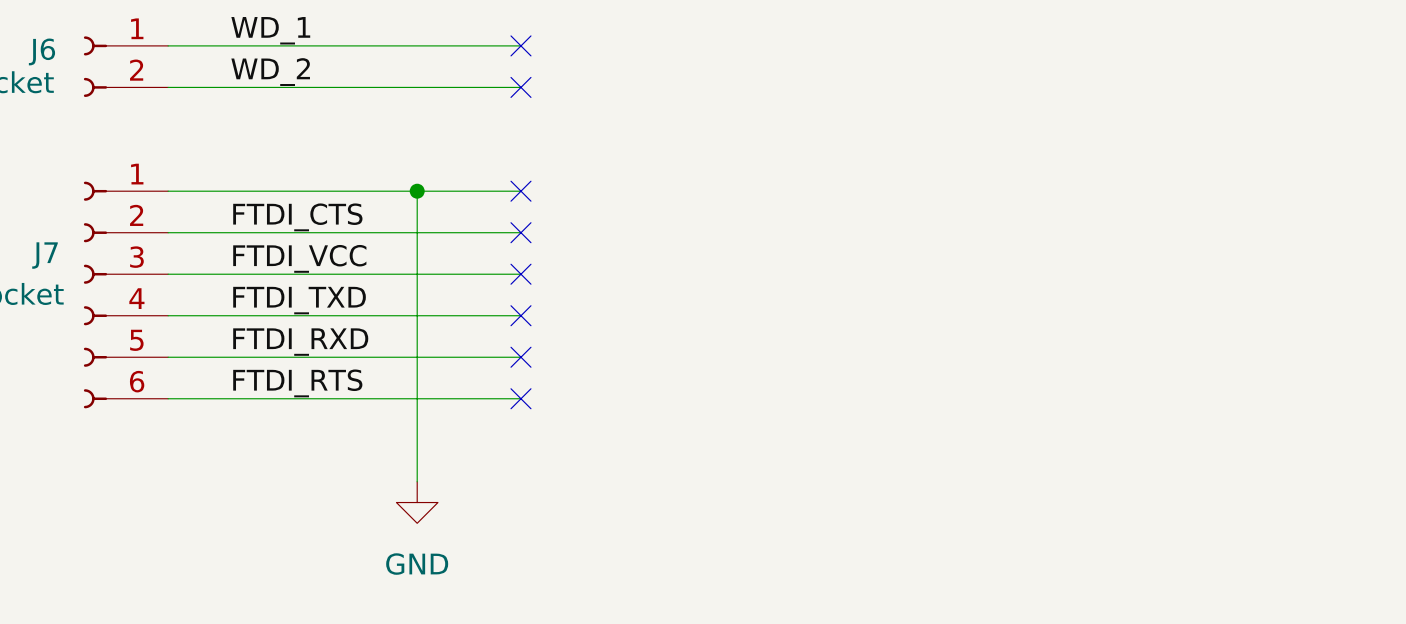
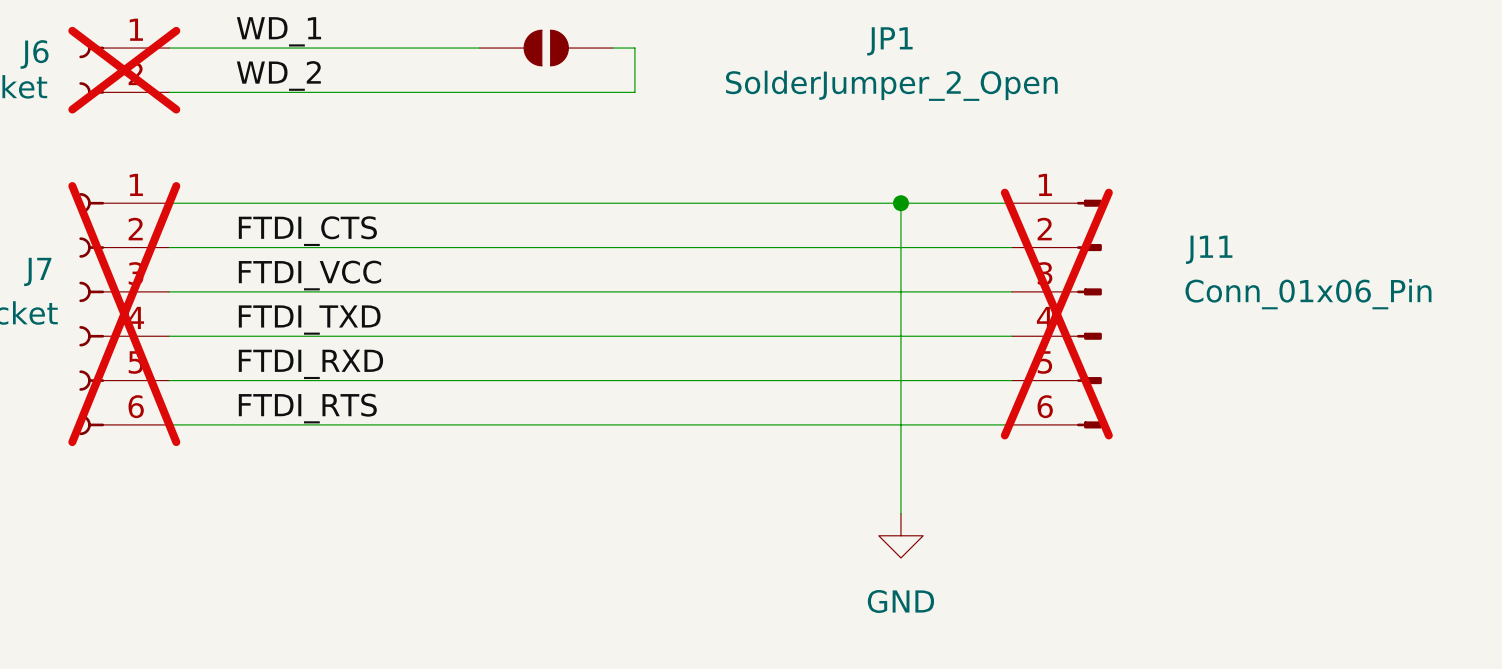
no-connect mark: (520, 45) -> none
JP1: none -> SolderJumper_2_Open (546, 48)
wire: none -> (612, 48) (634, 48) (634, 92) (546, 92)
J6 do-not-place cross: none -> (124, 70)
no-connect mark: (520, 87) -> none
wire: (417, 191) (417, 481) -> none
junction: (417, 191) -> none
wire: none -> (546, 203) (1011, 203)
no-connect mark: (520, 191) -> none
wire: none -> (900, 203) (900, 513)
junction: none -> (900, 203)
wire: none -> (546, 247) (1011, 247)
no-connect mark: (520, 232) -> none
wire: none -> (546, 291) (1011, 291)
no-connect mark: (520, 274) -> none
J7 do-not-place cross: none -> (124, 314)
J11: none -> Conn_01x06_Pin (1056, 314)
wire: none -> (546, 336) (1011, 336)
no-connect mark: (520, 315) -> none
wire: none -> (546, 380) (1011, 380)
no-connect mark: (520, 357) -> none
wire: none -> (546, 424) (1011, 424)
no-connect mark: (520, 398) -> none
power symbol: GND (417, 502) -> none
power symbol: none -> GND (900, 535)

